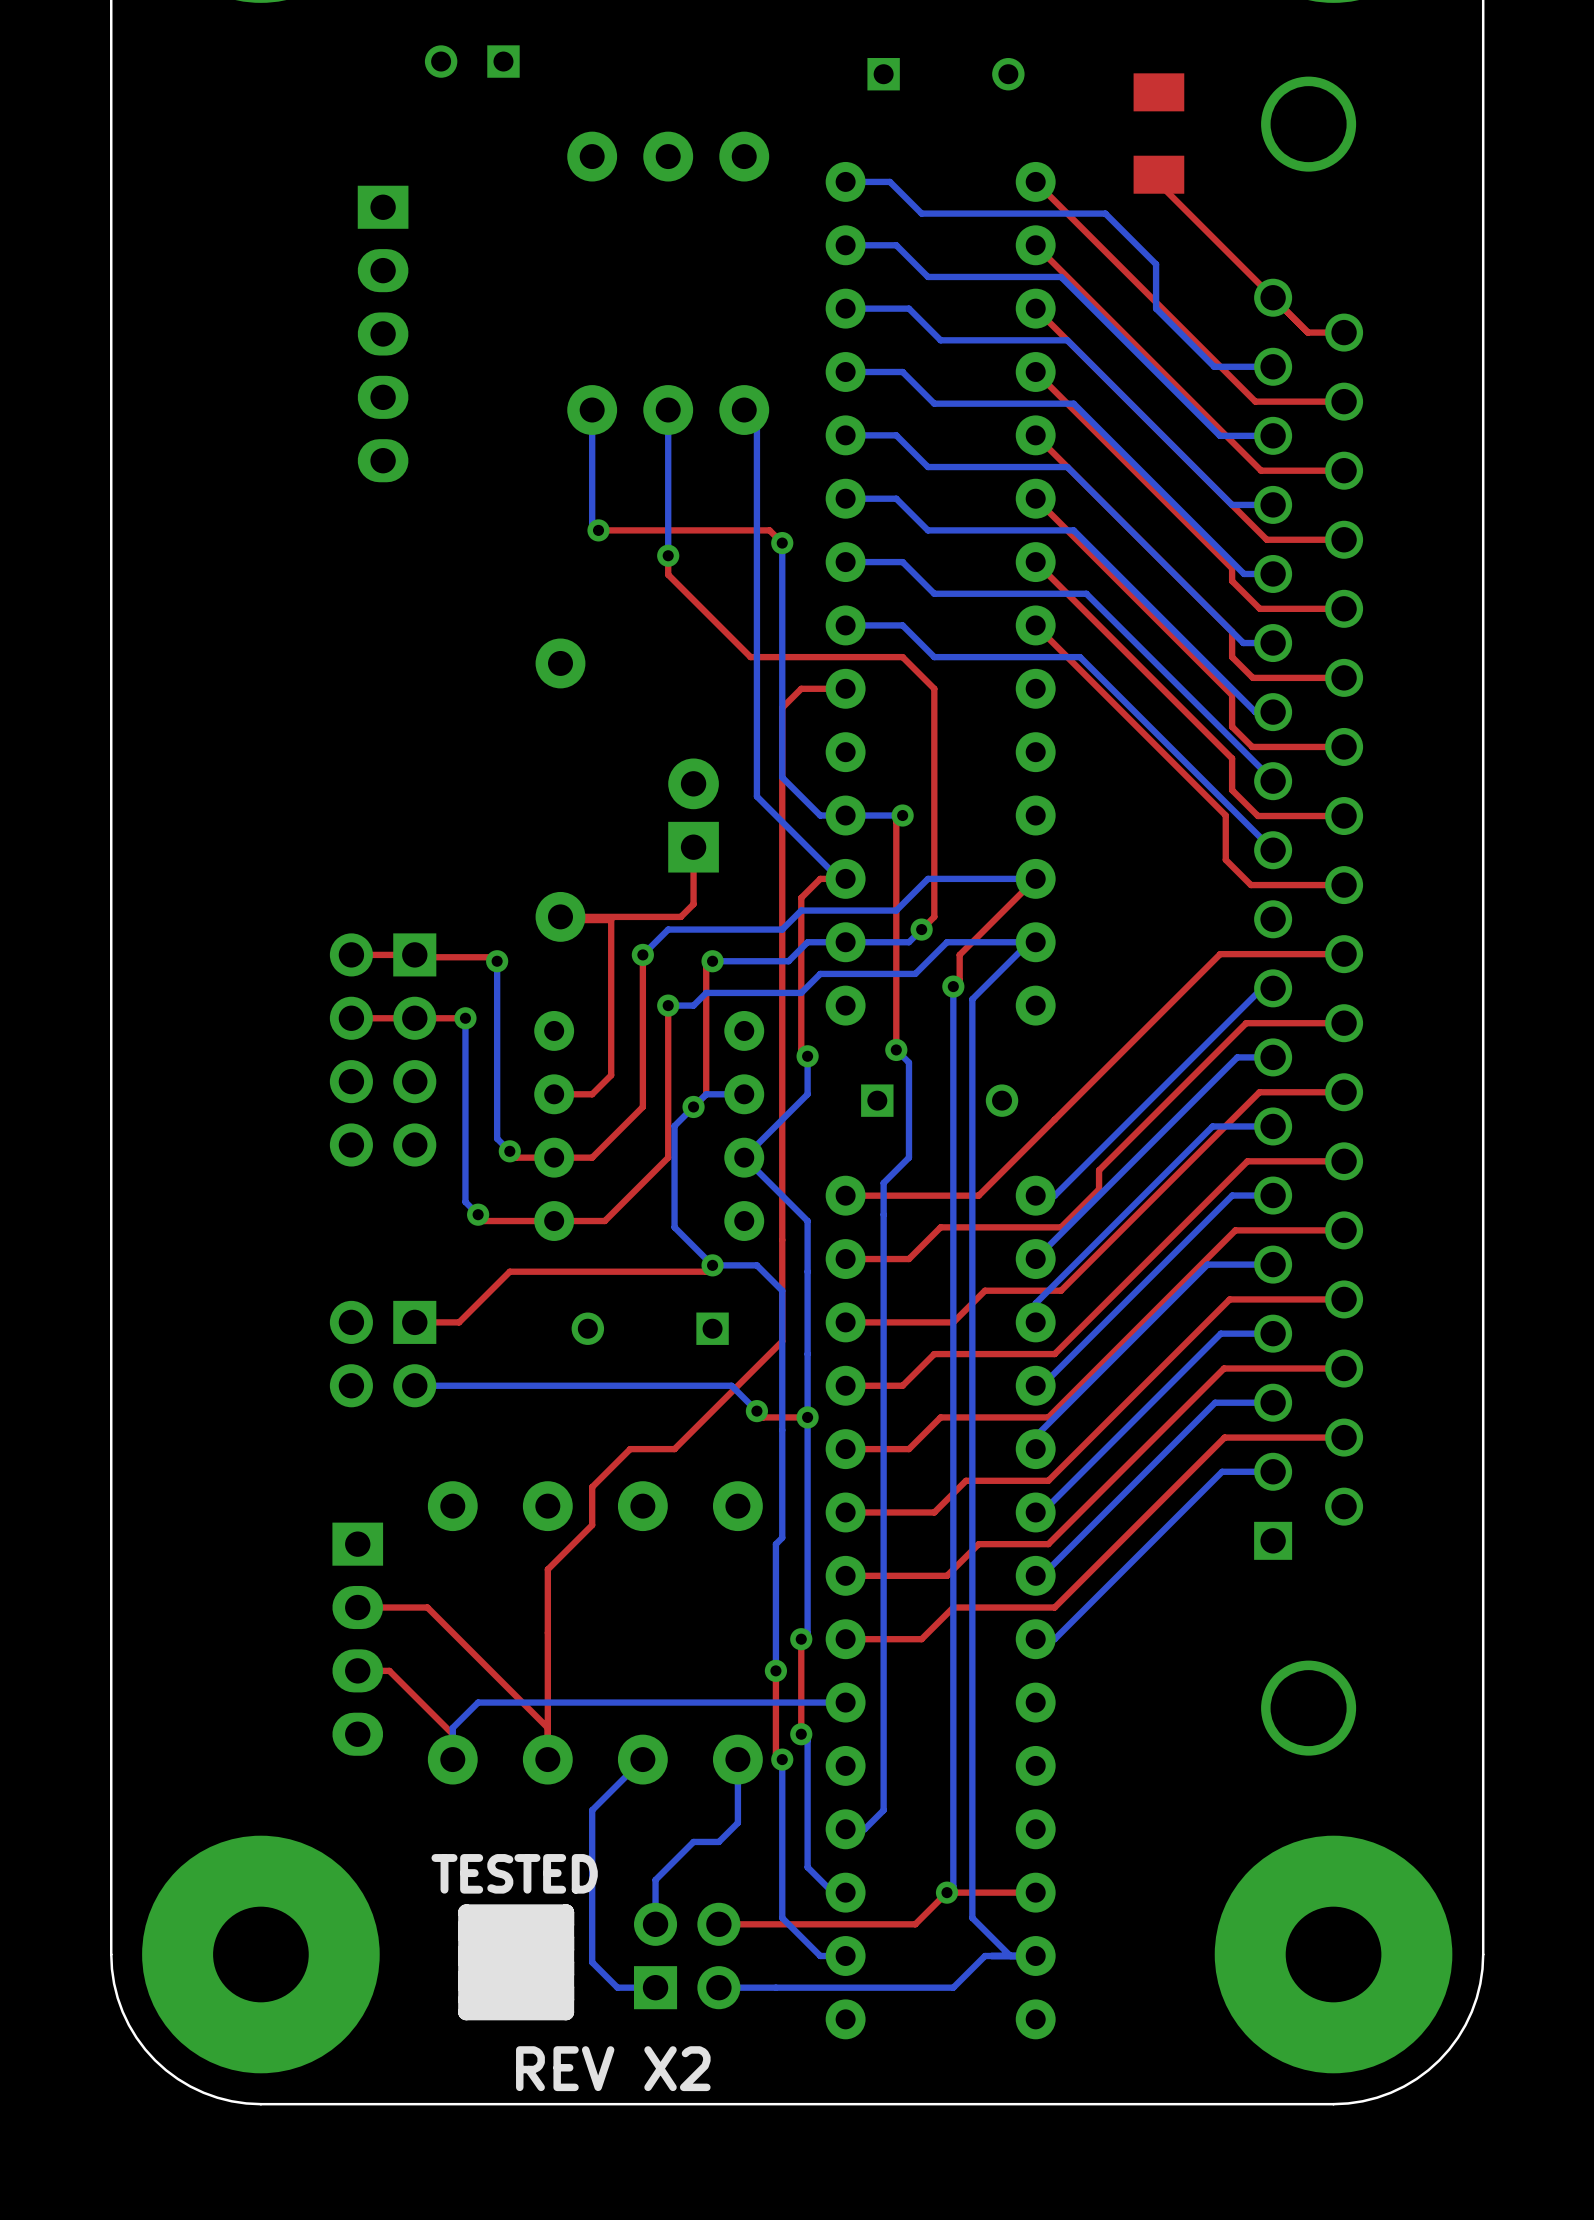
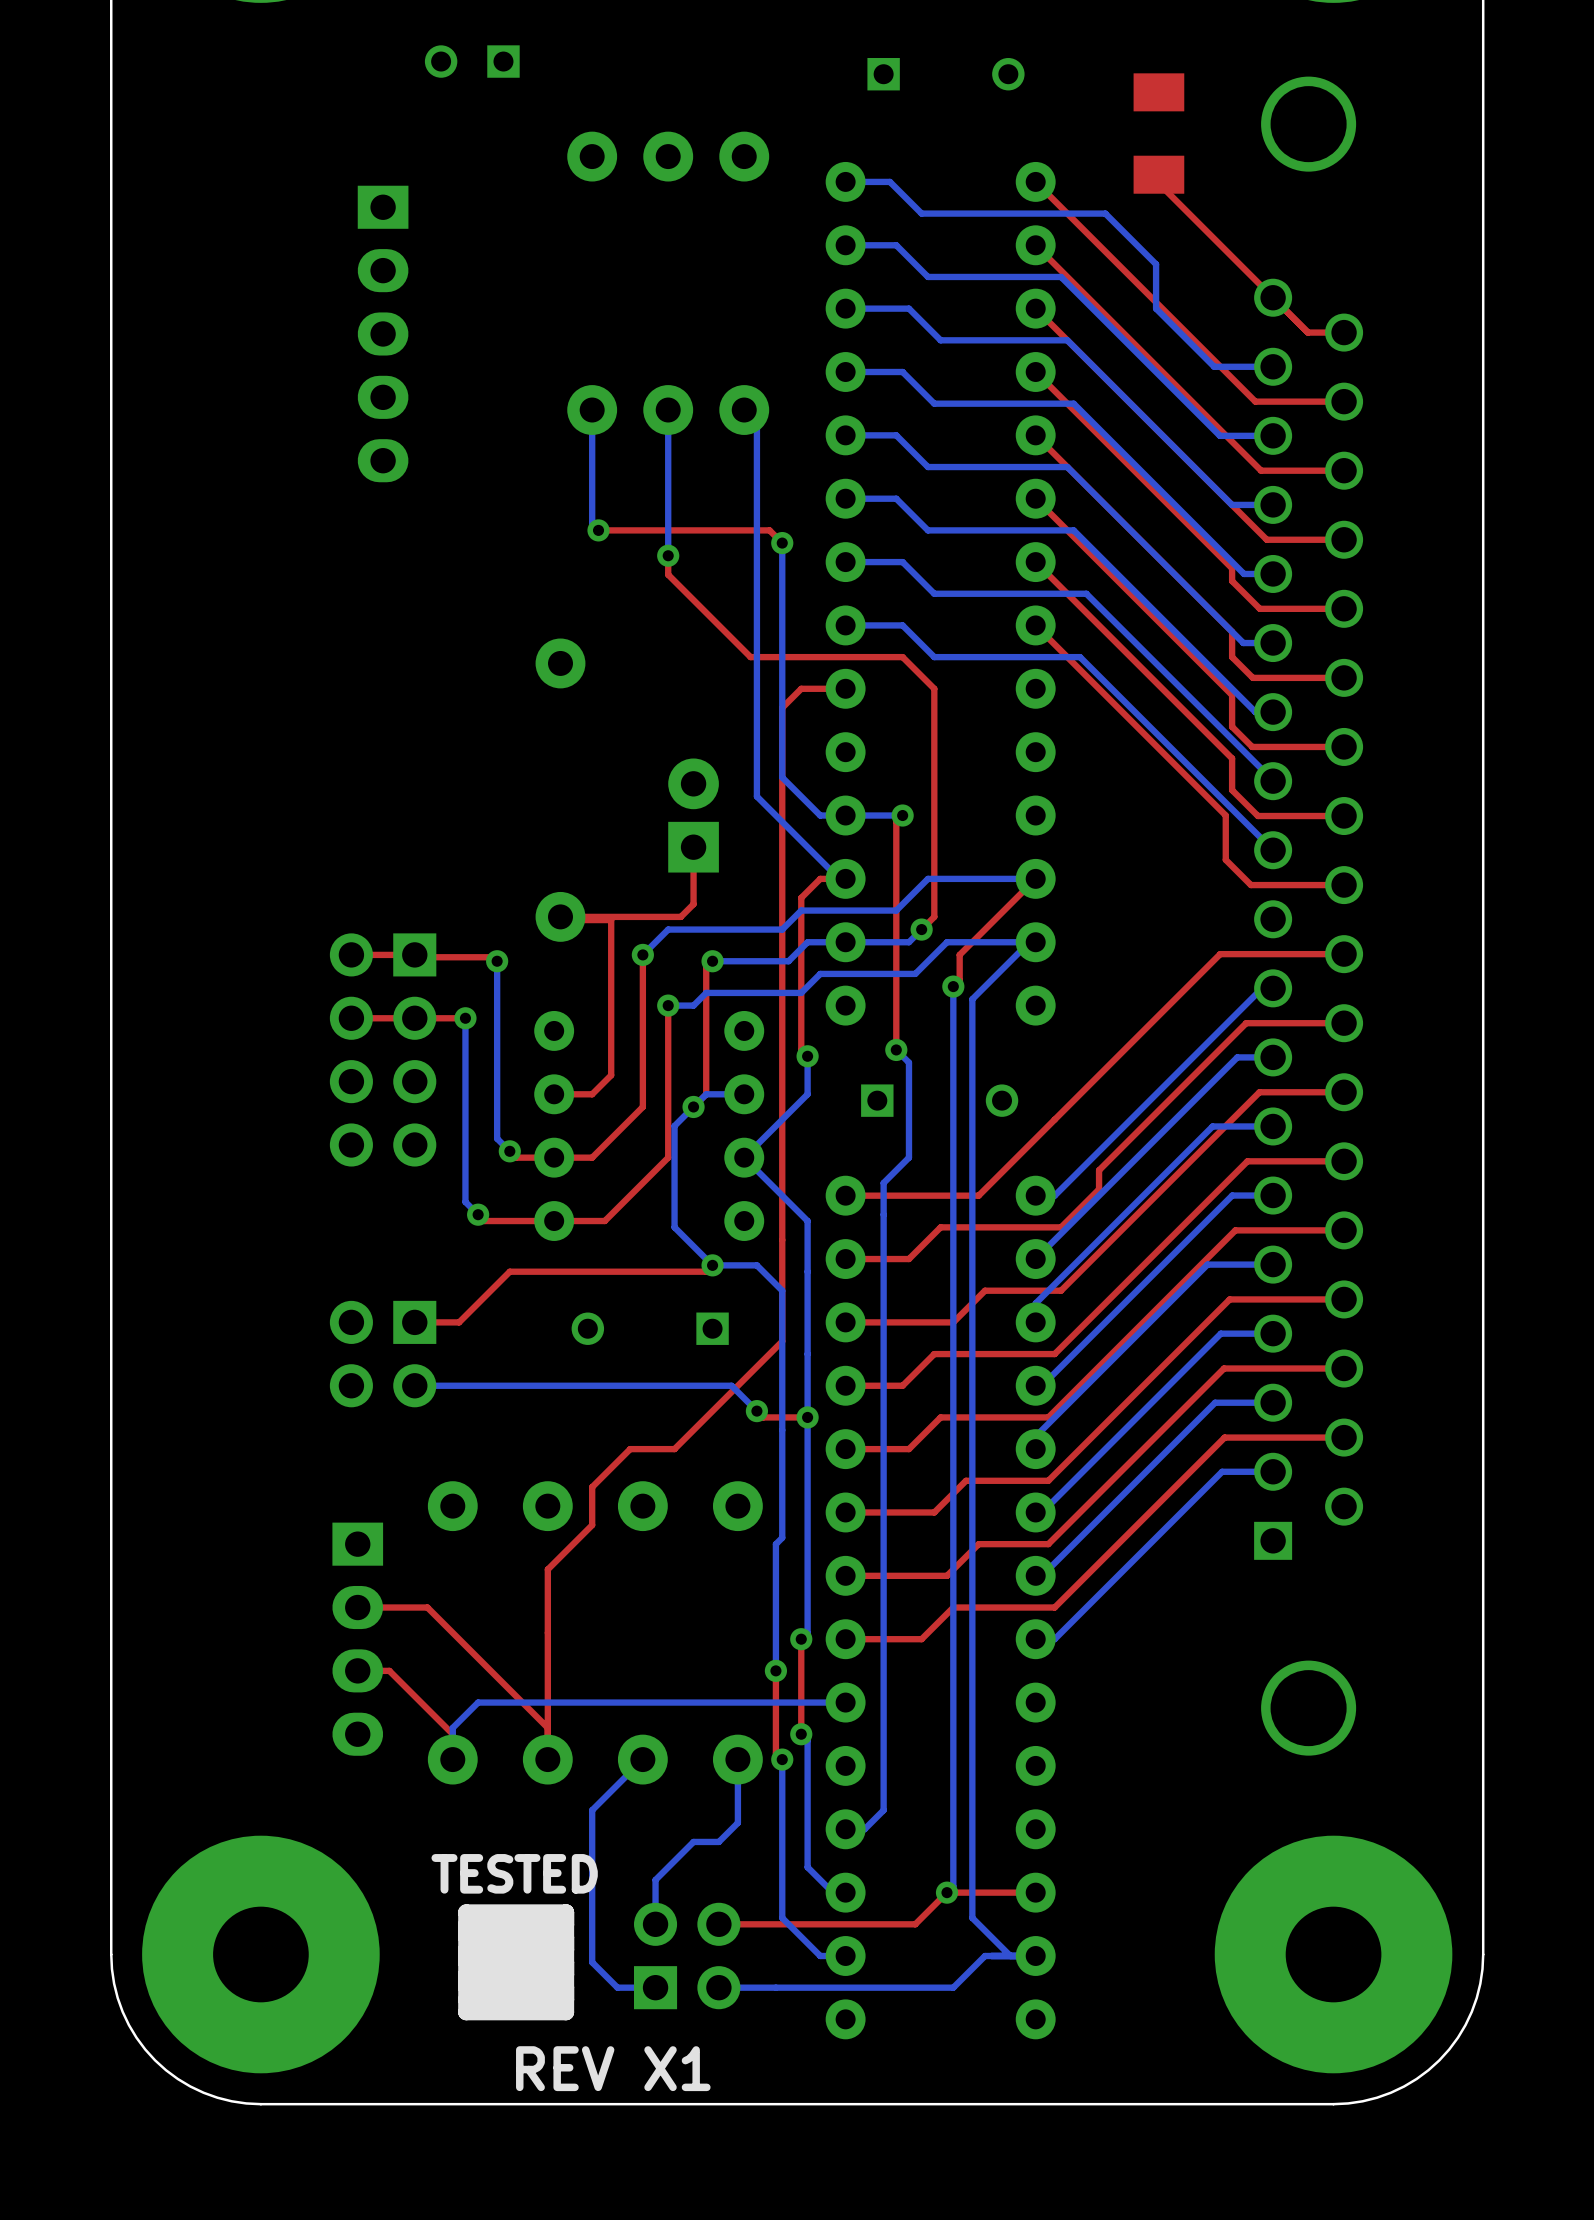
text: REV X2 (613, 2068) -> REV X1 (613, 2068)

